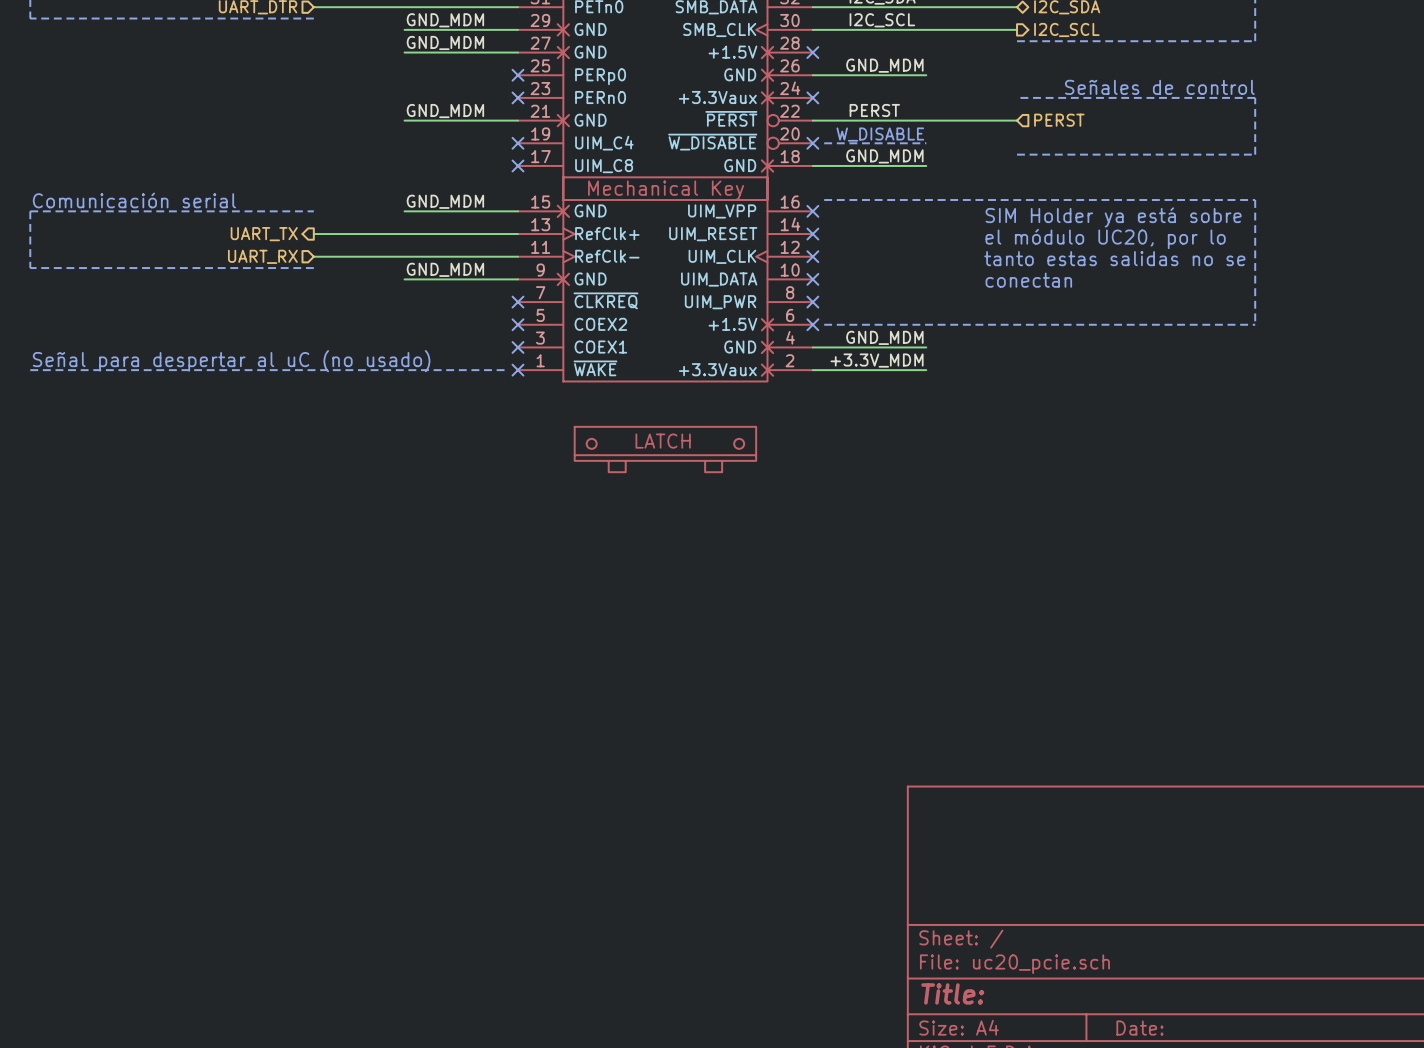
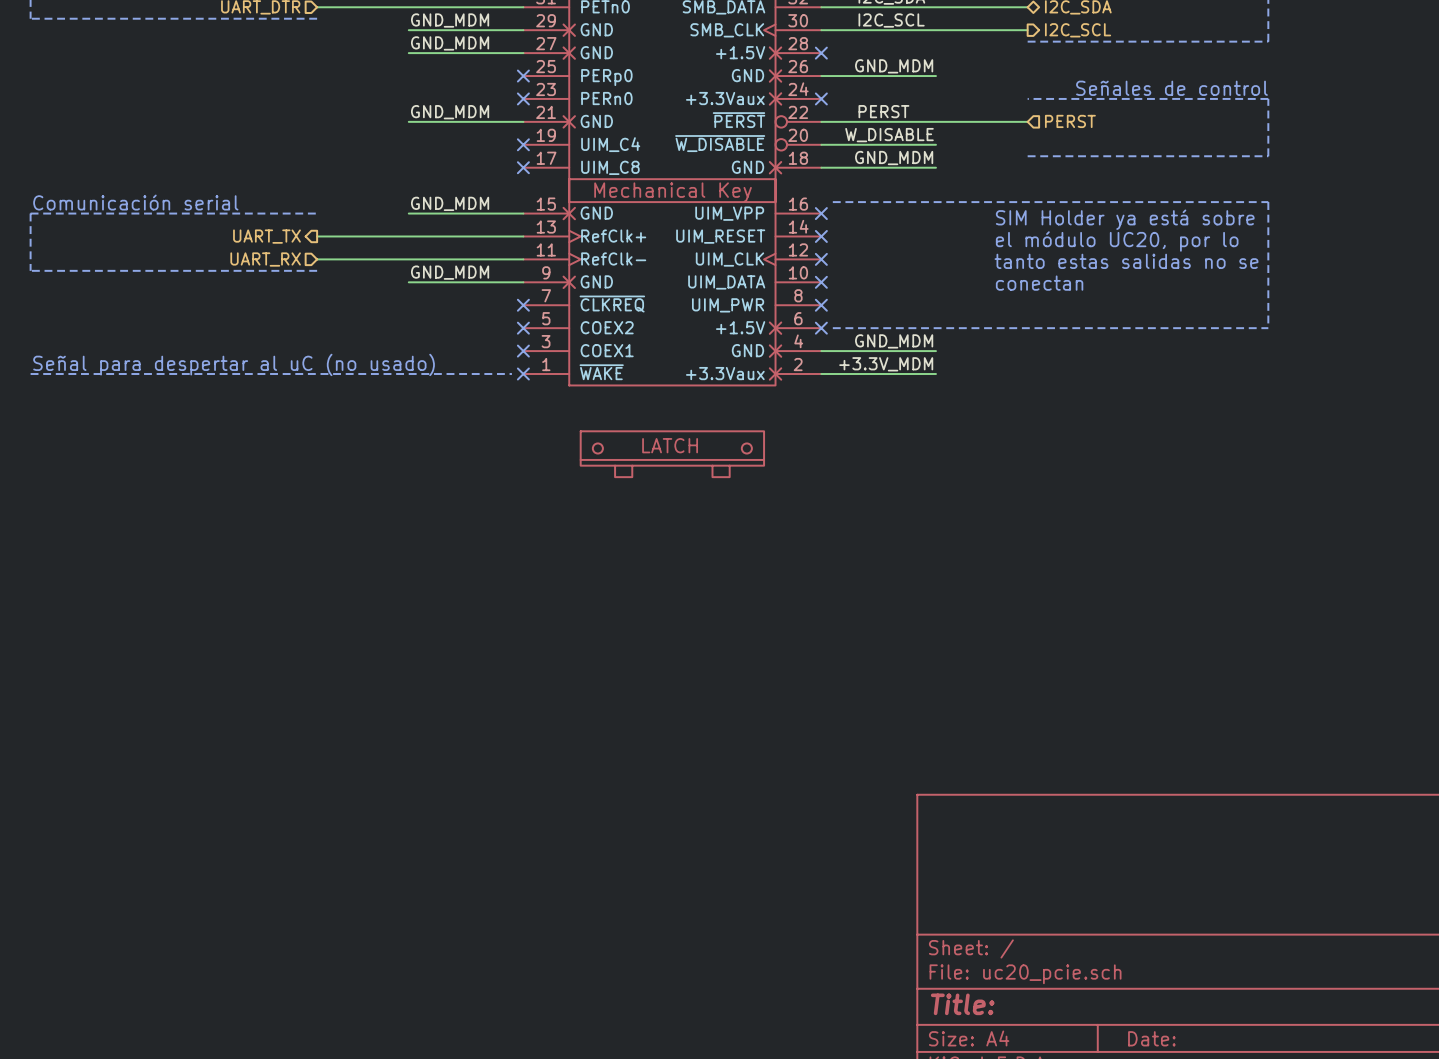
label: none -> W_DISABLE (889, 135)
text: W_DISABLE (880, 134) -> none
no-connect mark: (812, 143) -> none
line: (824, 143) (926, 143) -> none

